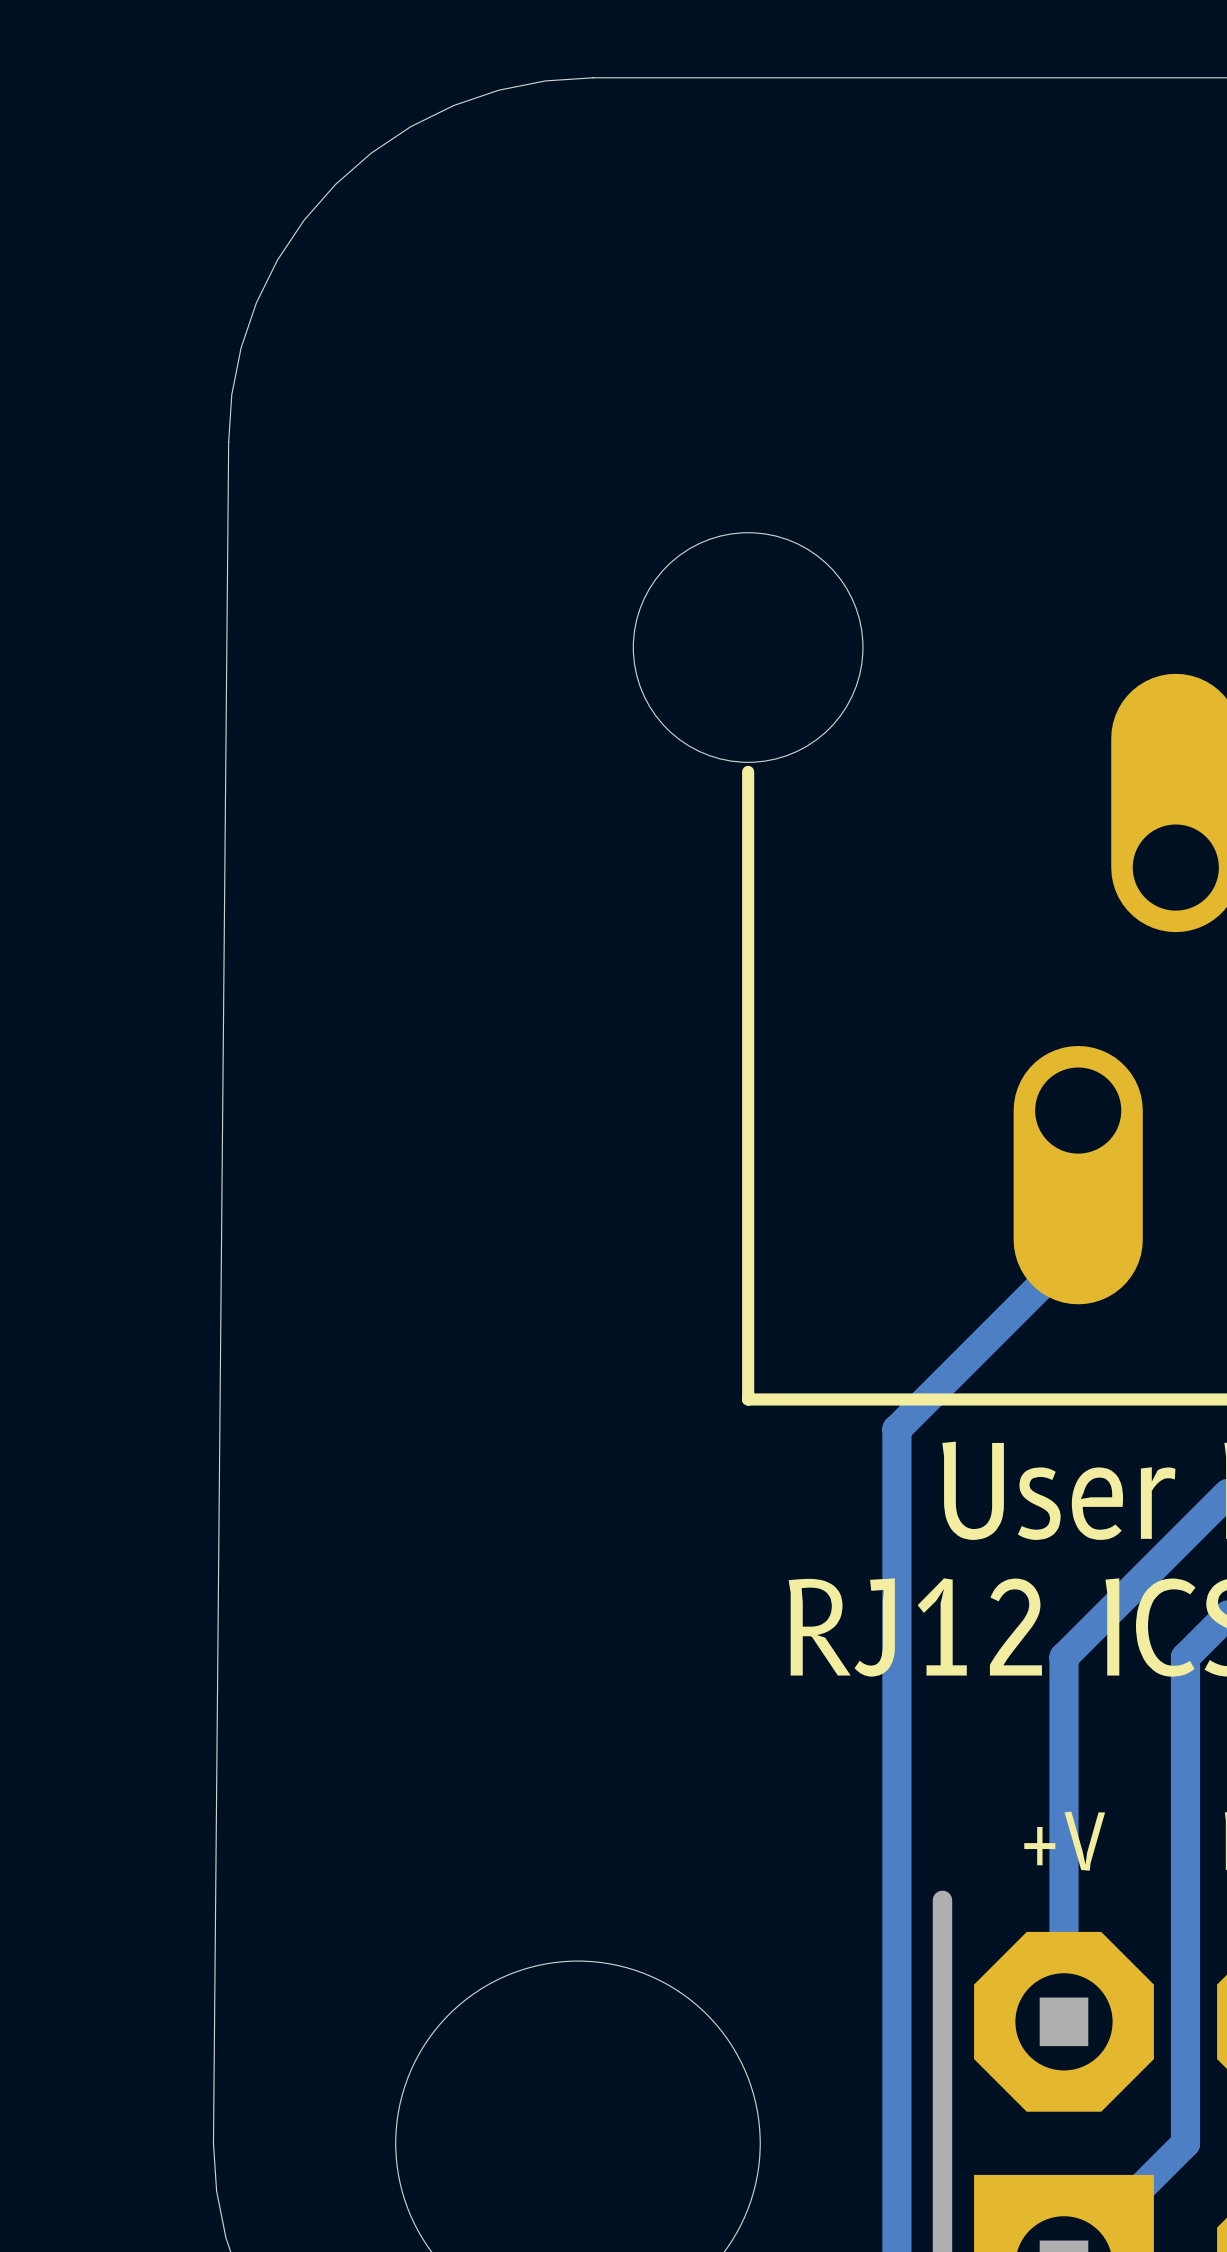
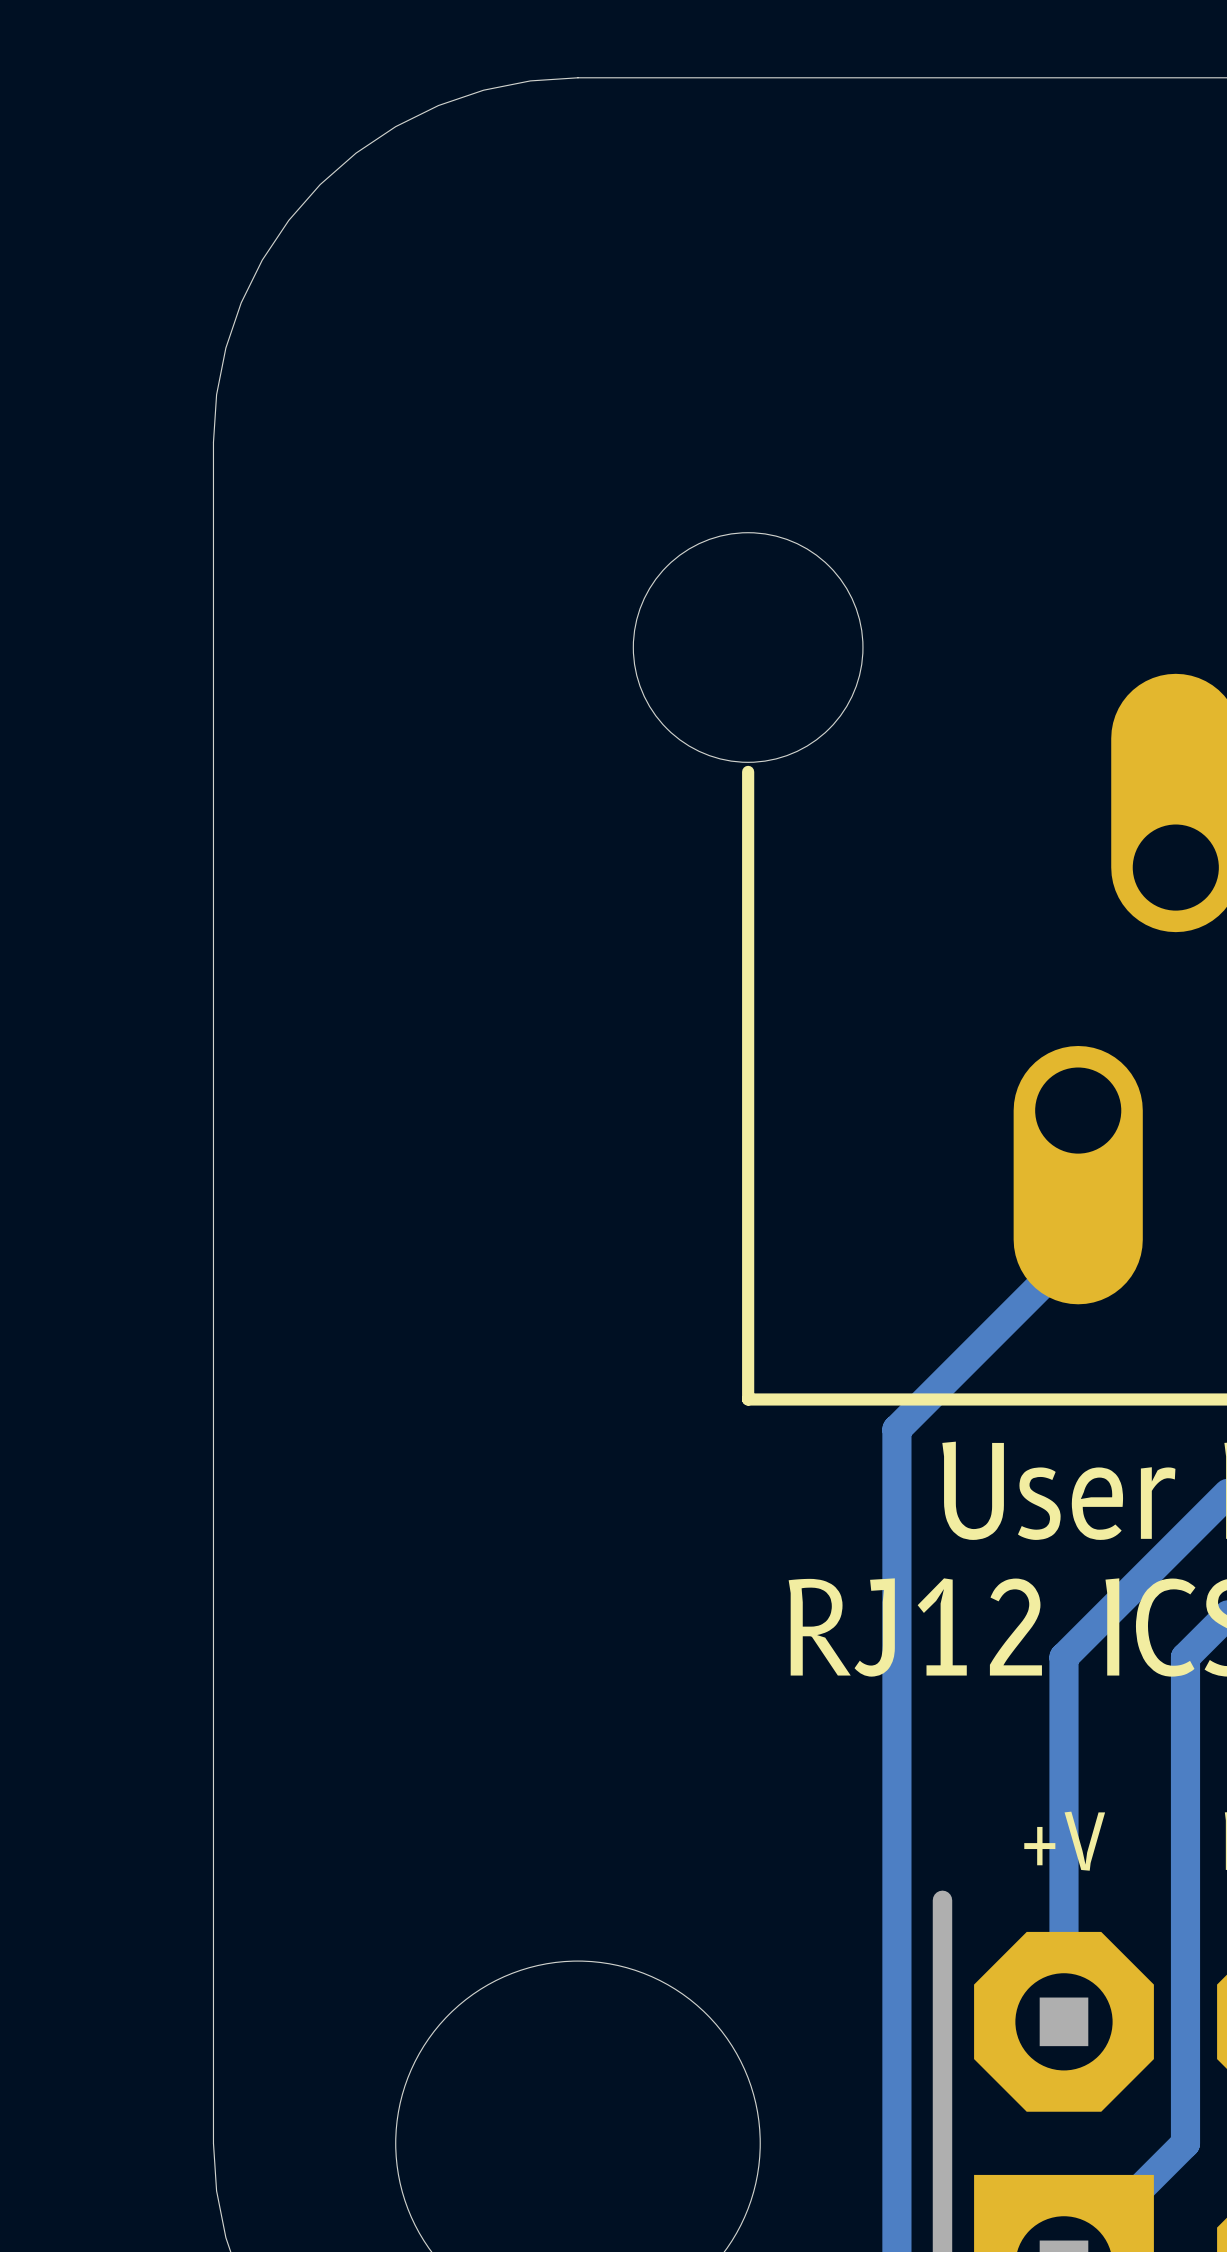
board edge: (593, 77) (545, 80) (498, 90) (453, 105) (410, 126) (371, 153) (335, 184) (303, 220) (277, 260) (256, 302) (241, 347) (231, 394) (228, 442) (213, 2143) -> (593, 77) (530, 80) (483, 90) (438, 105) (395, 126) (356, 153) (320, 184) (288, 220) (262, 260) (241, 302) (225, 347) (216, 394) (213, 442) (213, 2143)

